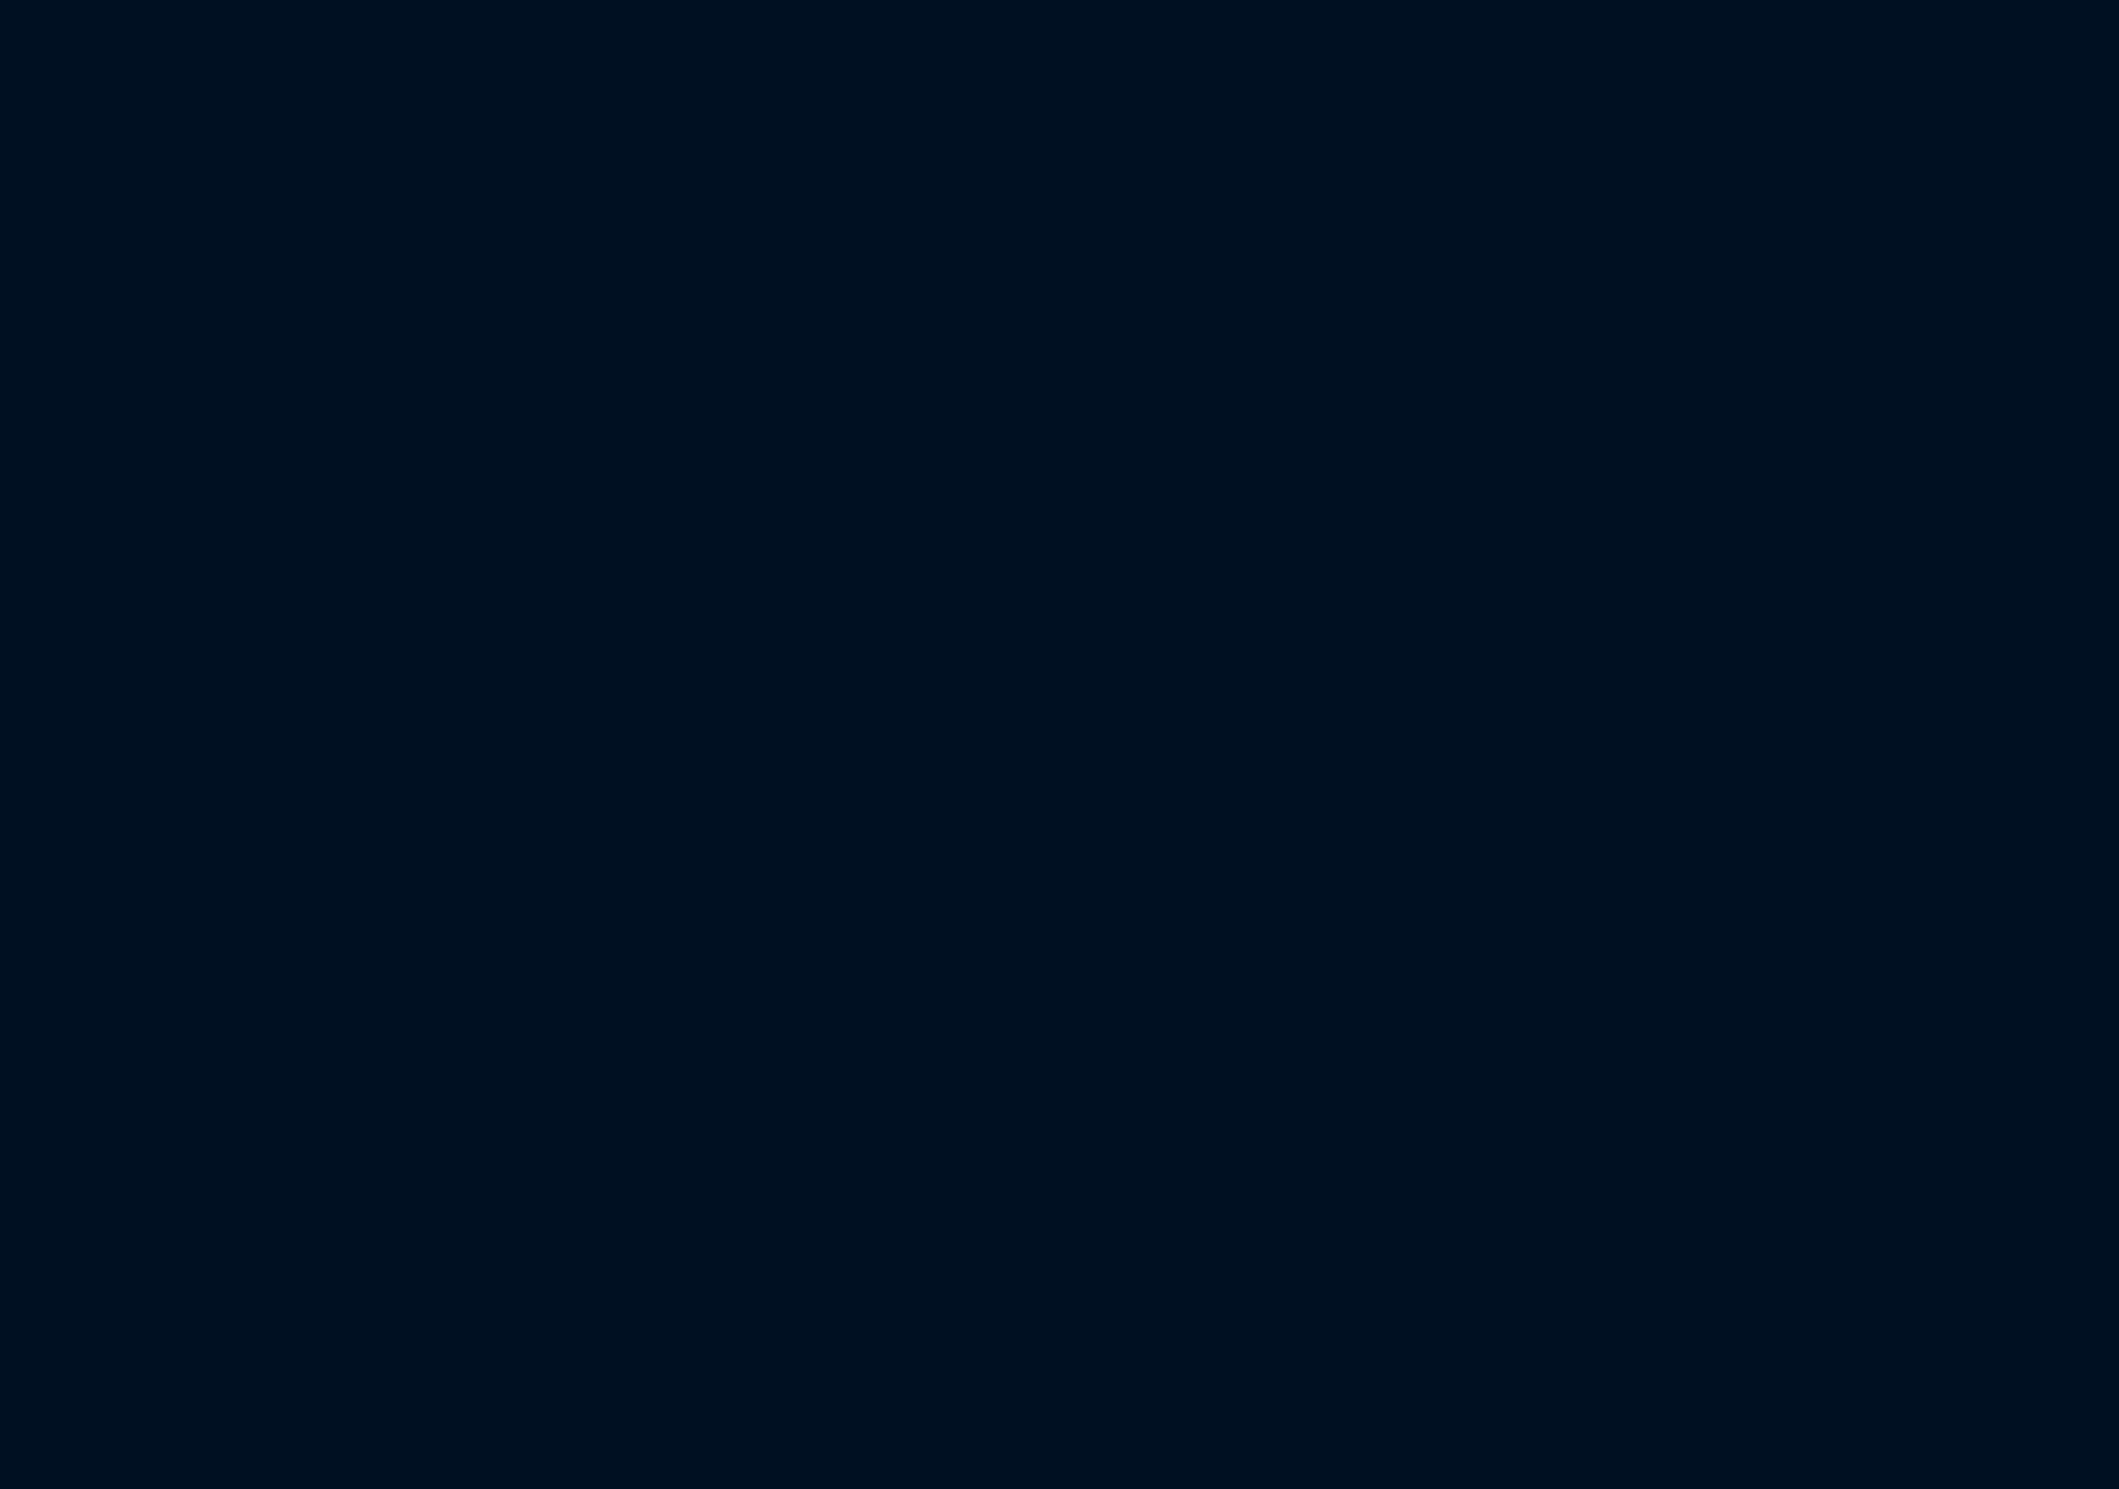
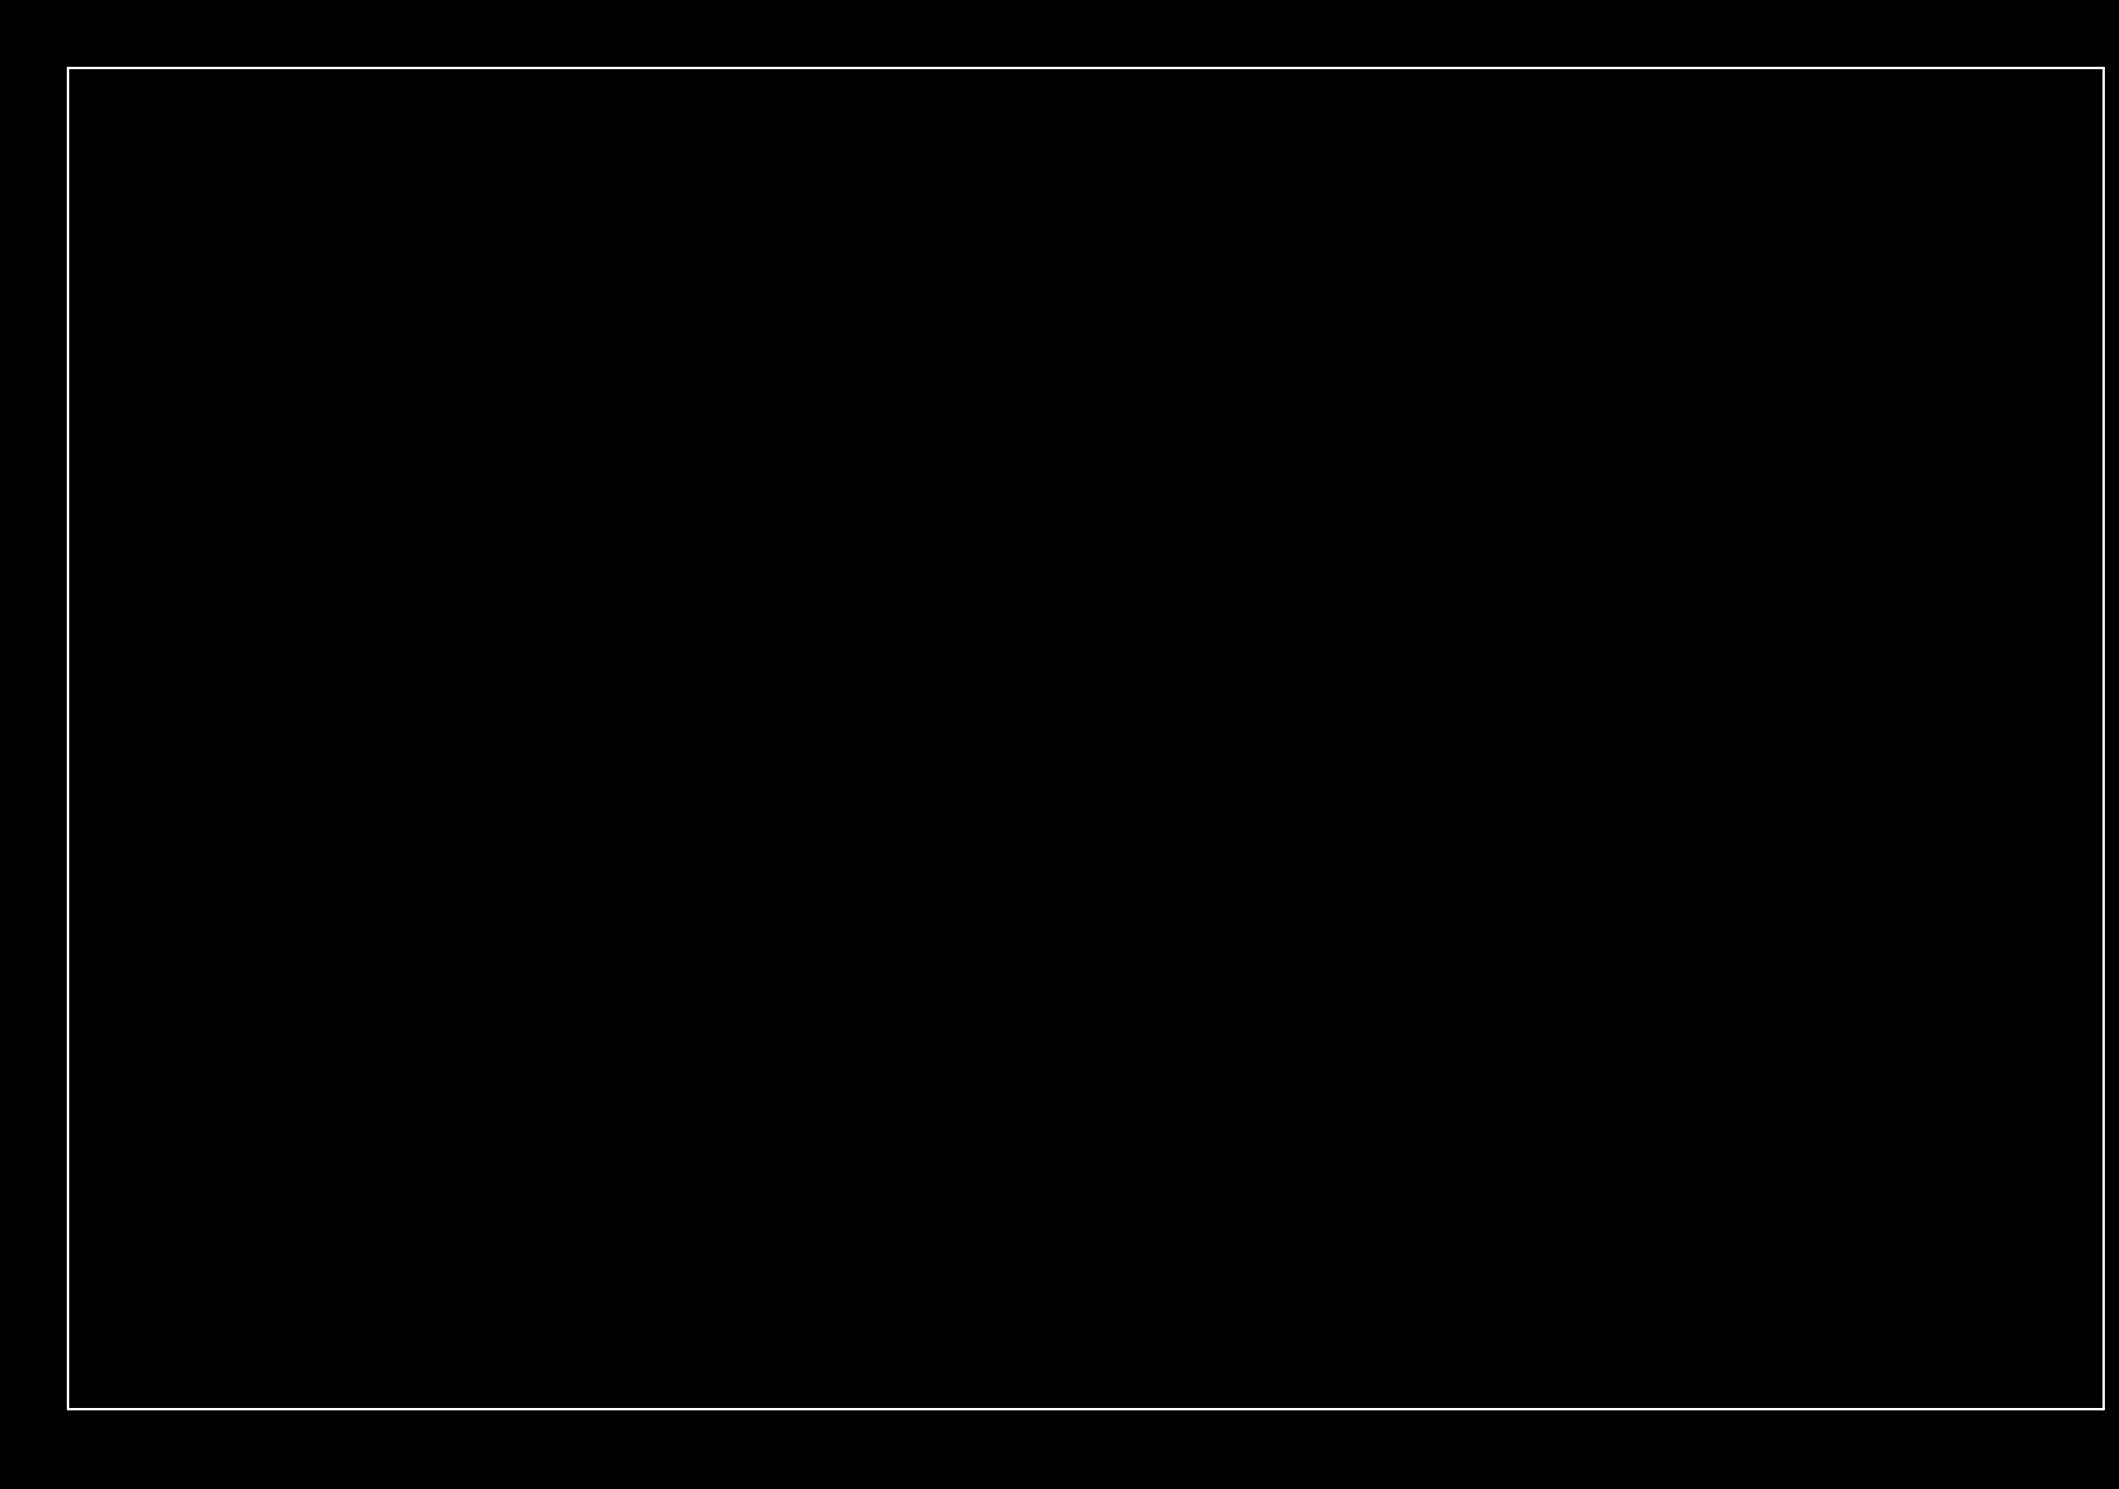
board edge: none -> (67, 67) (2103, 67) (2103, 1409) (67, 1409) (67, 67)

